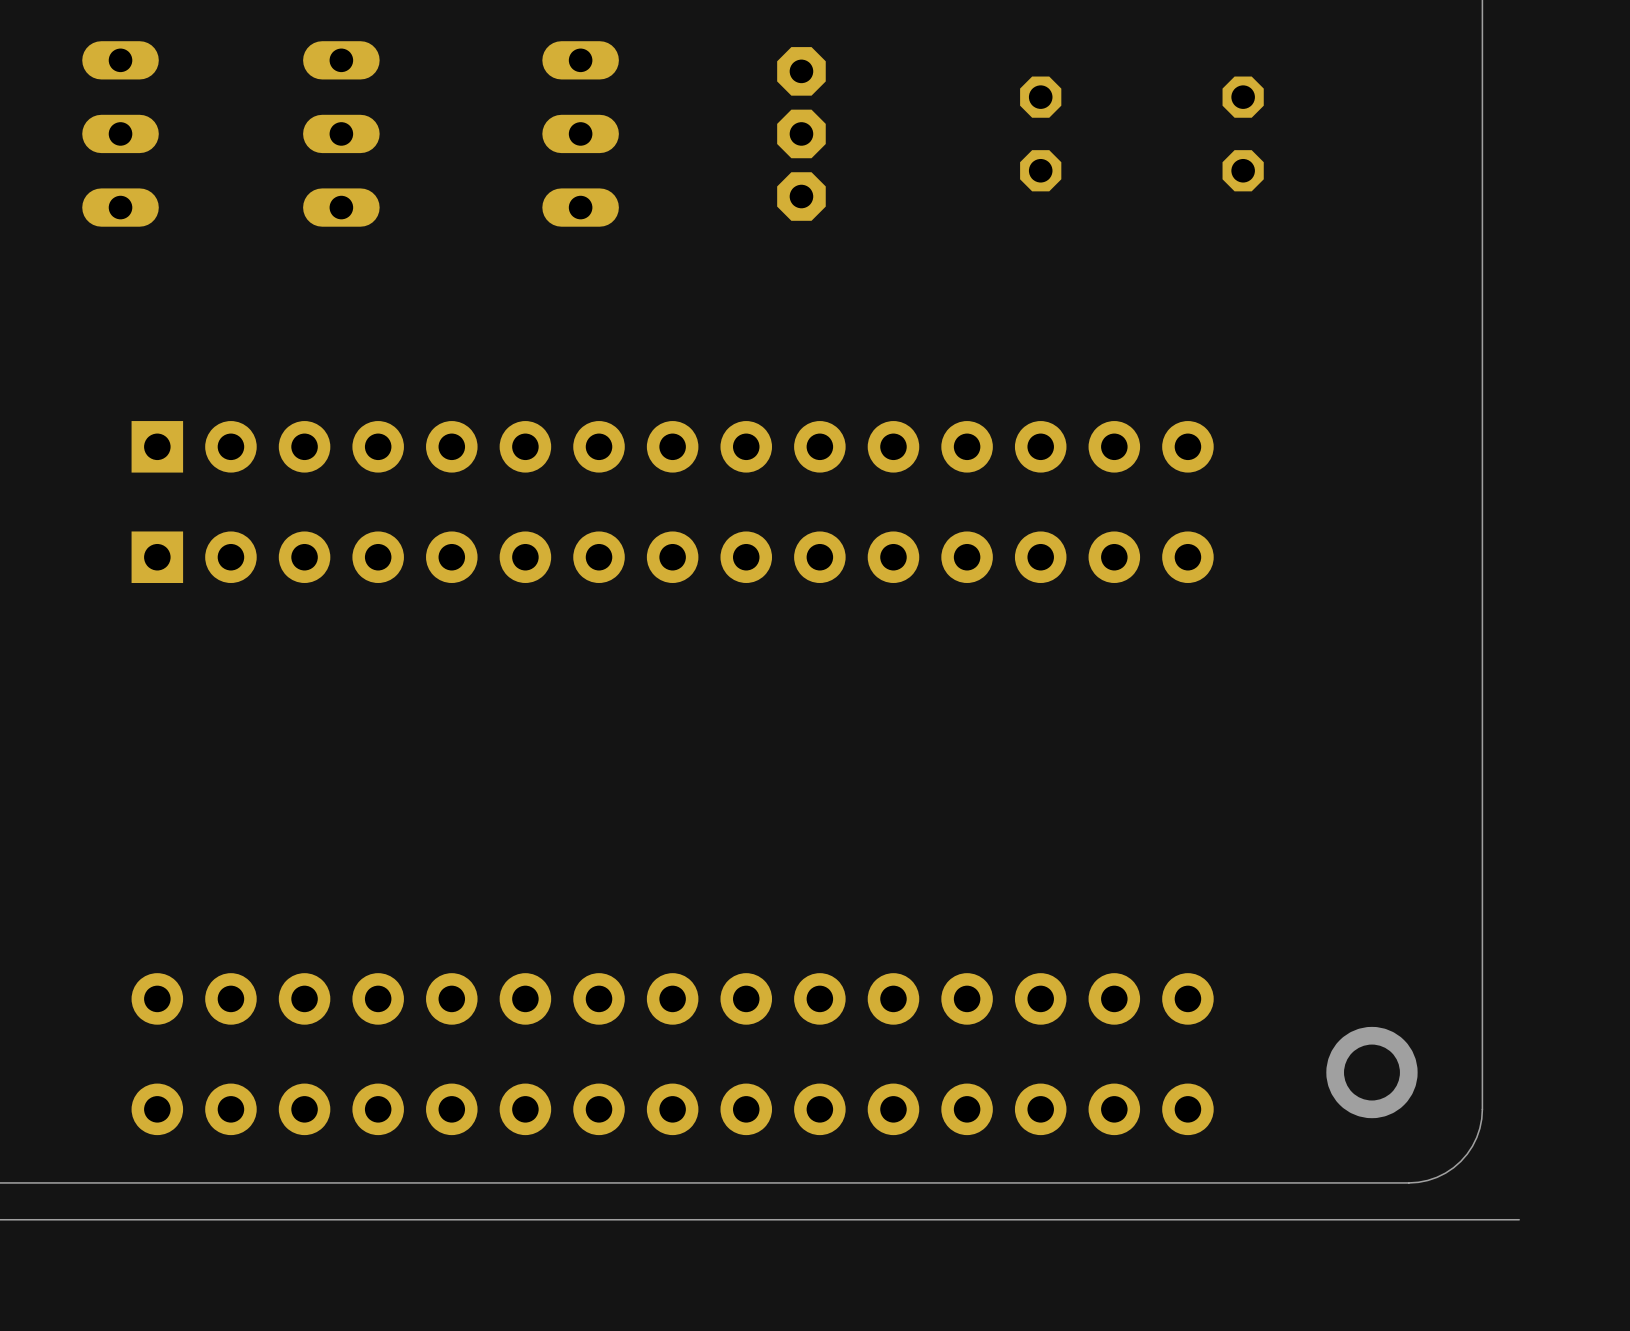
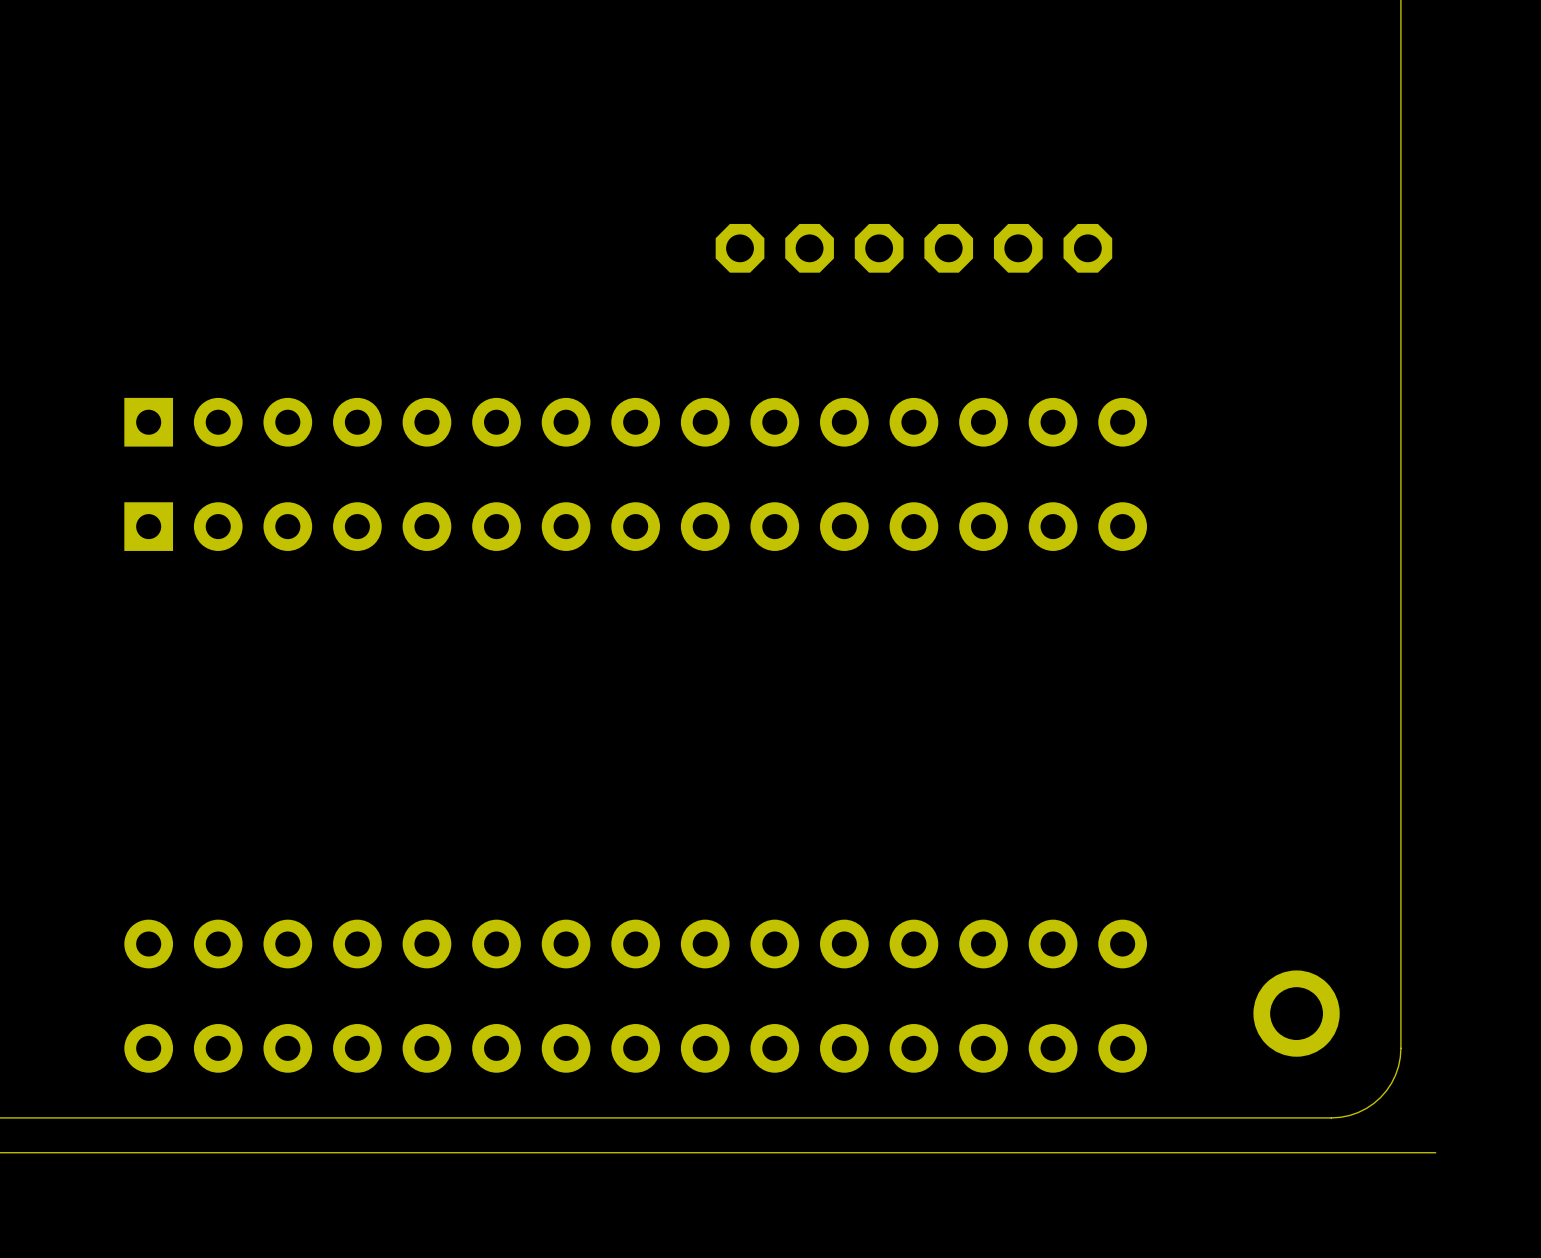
part: (120, 133) -> none
part: (341, 133) -> none
part: (580, 133) -> none
part: (801, 133) -> none
part: (1040, 133) -> none
part: (1243, 133) -> none
part: none -> (913, 248)

